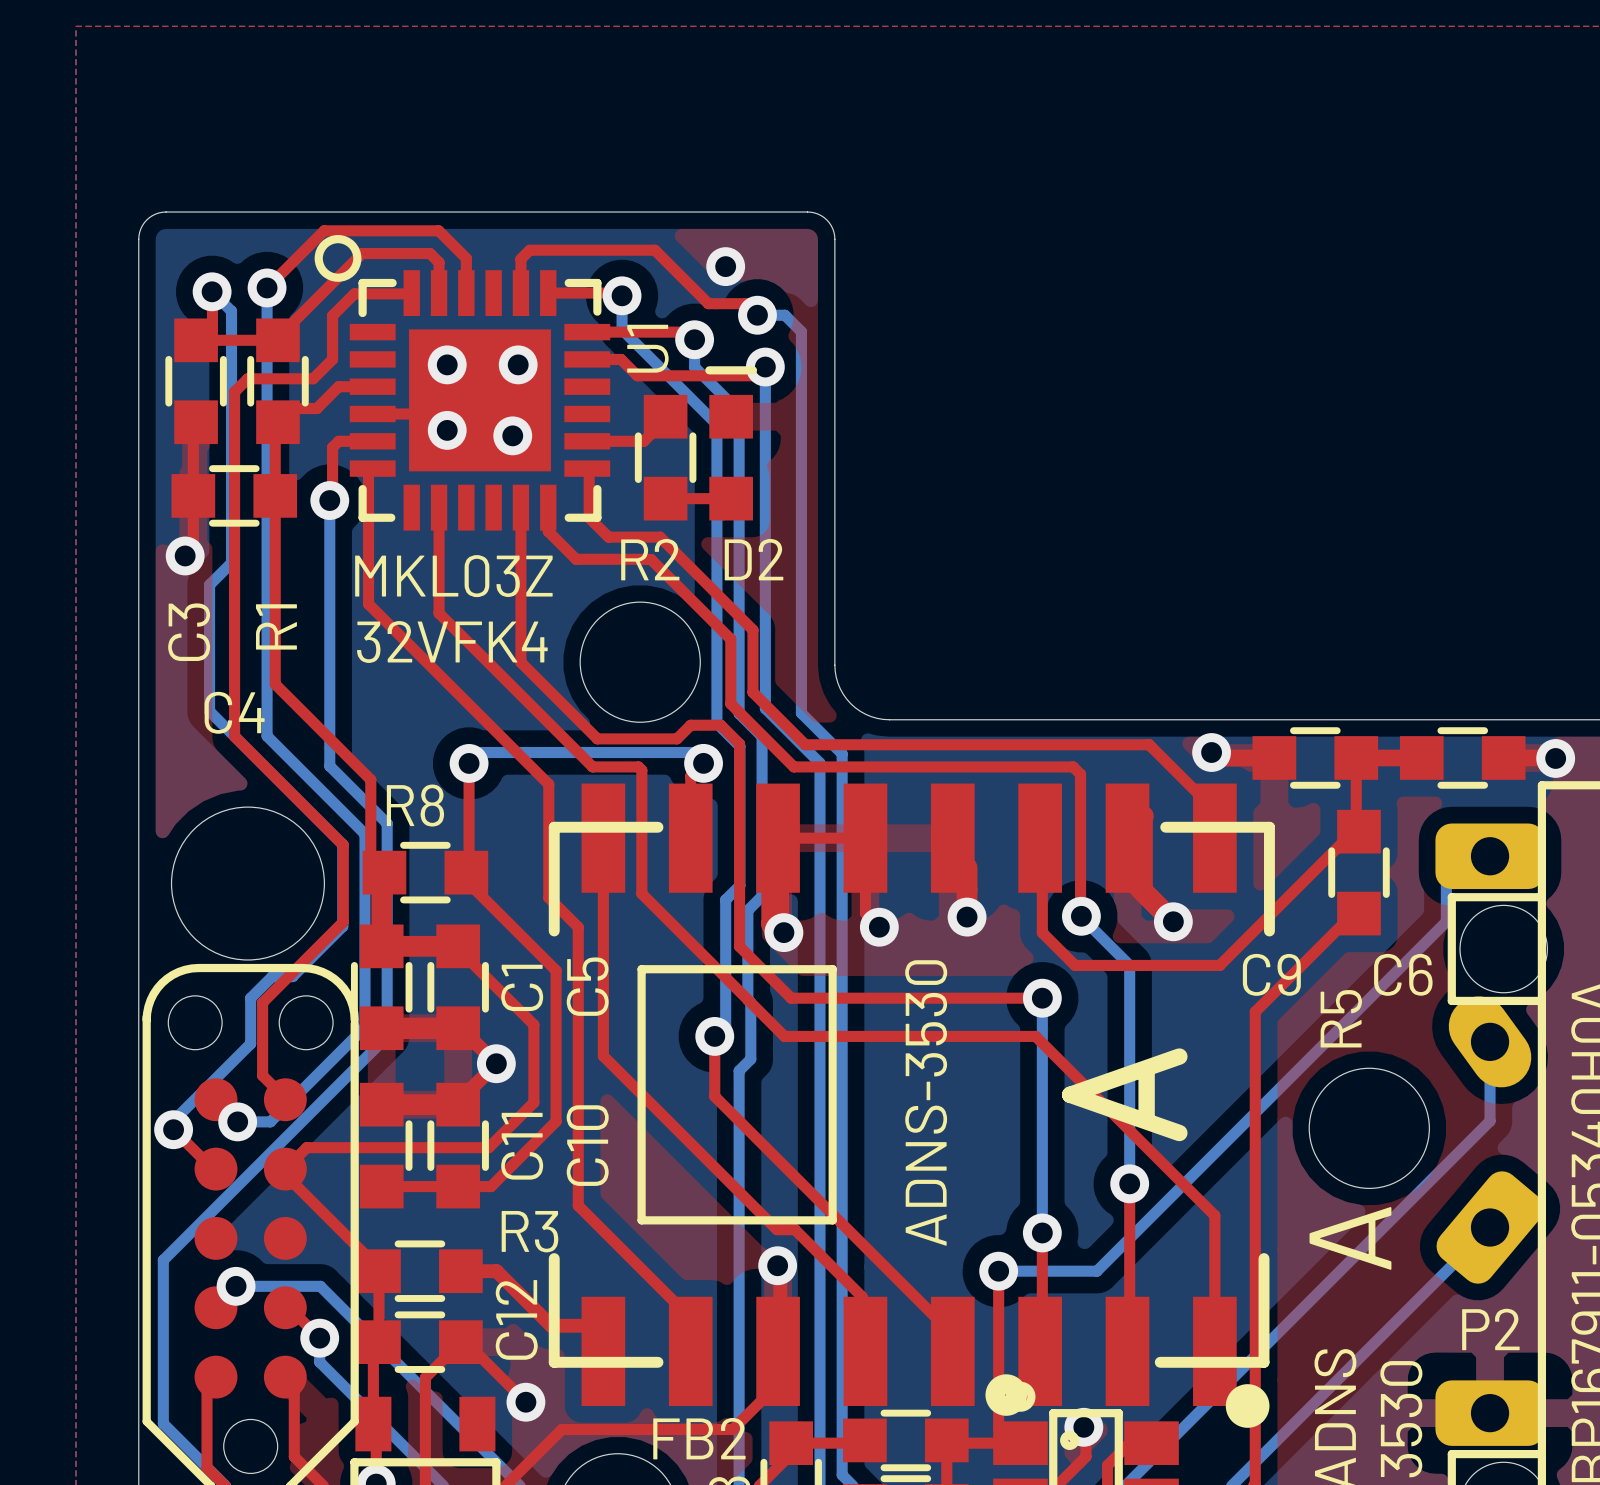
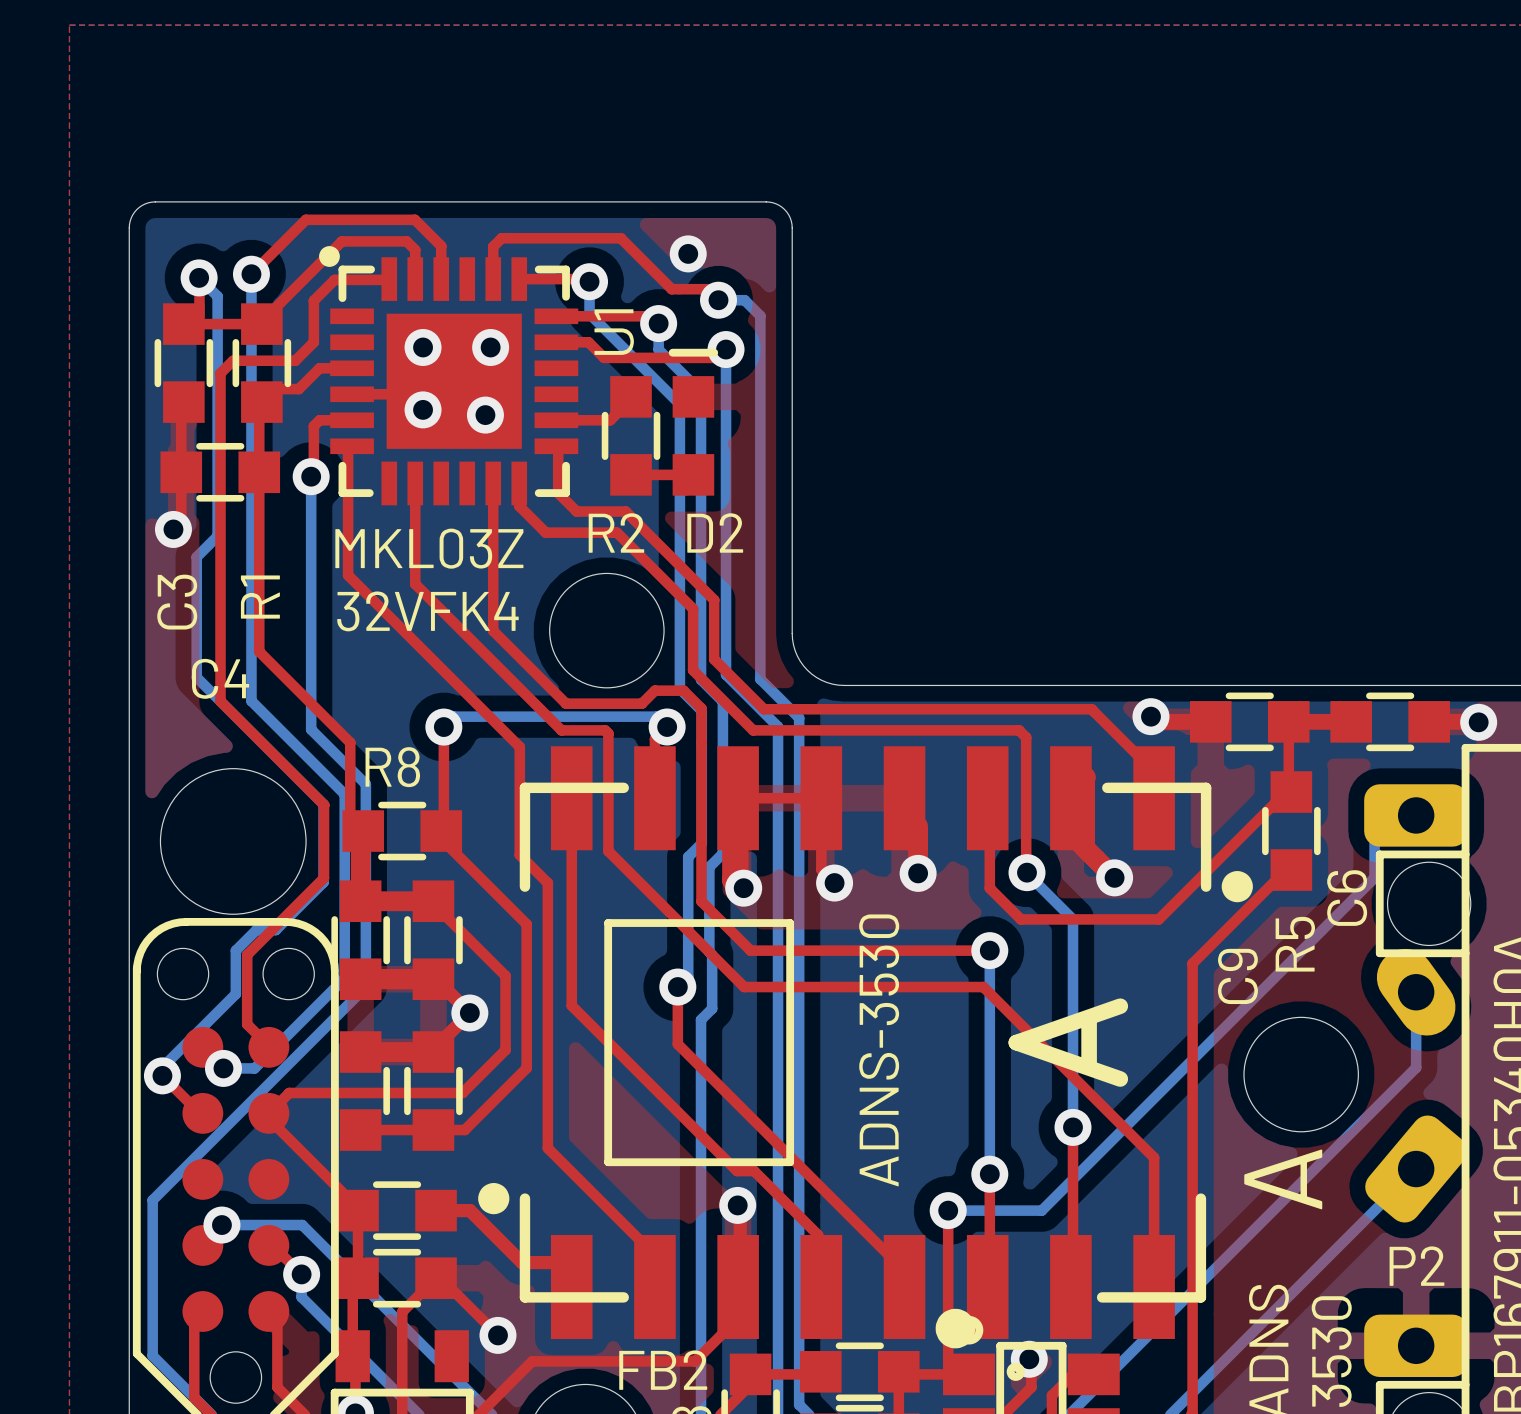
U1 footprint: [314, 235, 611, 531] -> [319, 246, 579, 506]
part footprint: [548, 783, 1275, 1428] -> [478, 746, 1253, 1339]
C9 name rotation: 0° (1271, 974) -> 90° counterclockwise (1237, 976)
C6 name rotation: 0° (1403, 974) -> 90° counterclockwise (1347, 898)
C5 name: C5 (587, 986) -> none
C1 name: C1 (522, 987) -> none
R5 name position: R5 (1341, 1018) -> R5 (1295, 944)
C10 name: C10 (587, 1145) -> none
C11 name: C11 (522, 1146) -> none
R3 name: R3 (529, 1231) -> none
C12 name: C12 (516, 1319) -> none

